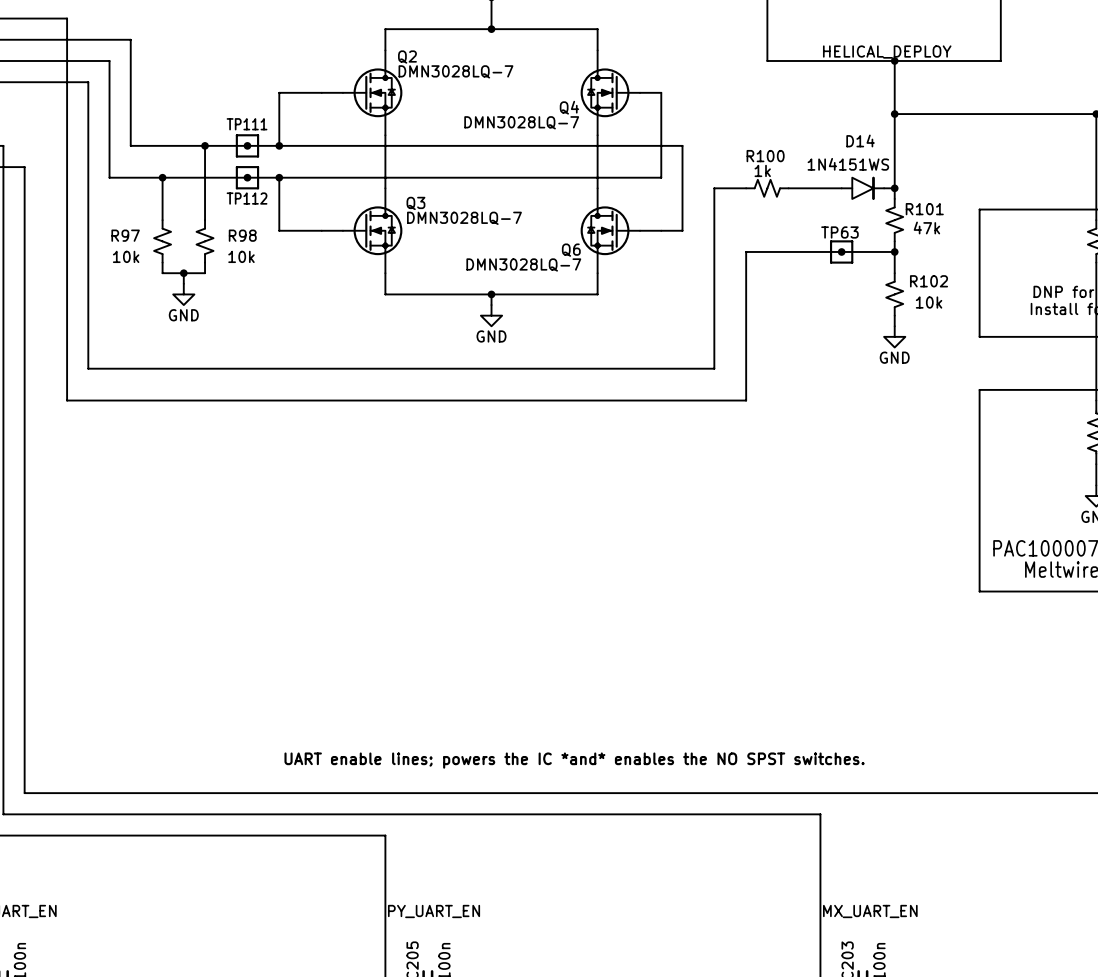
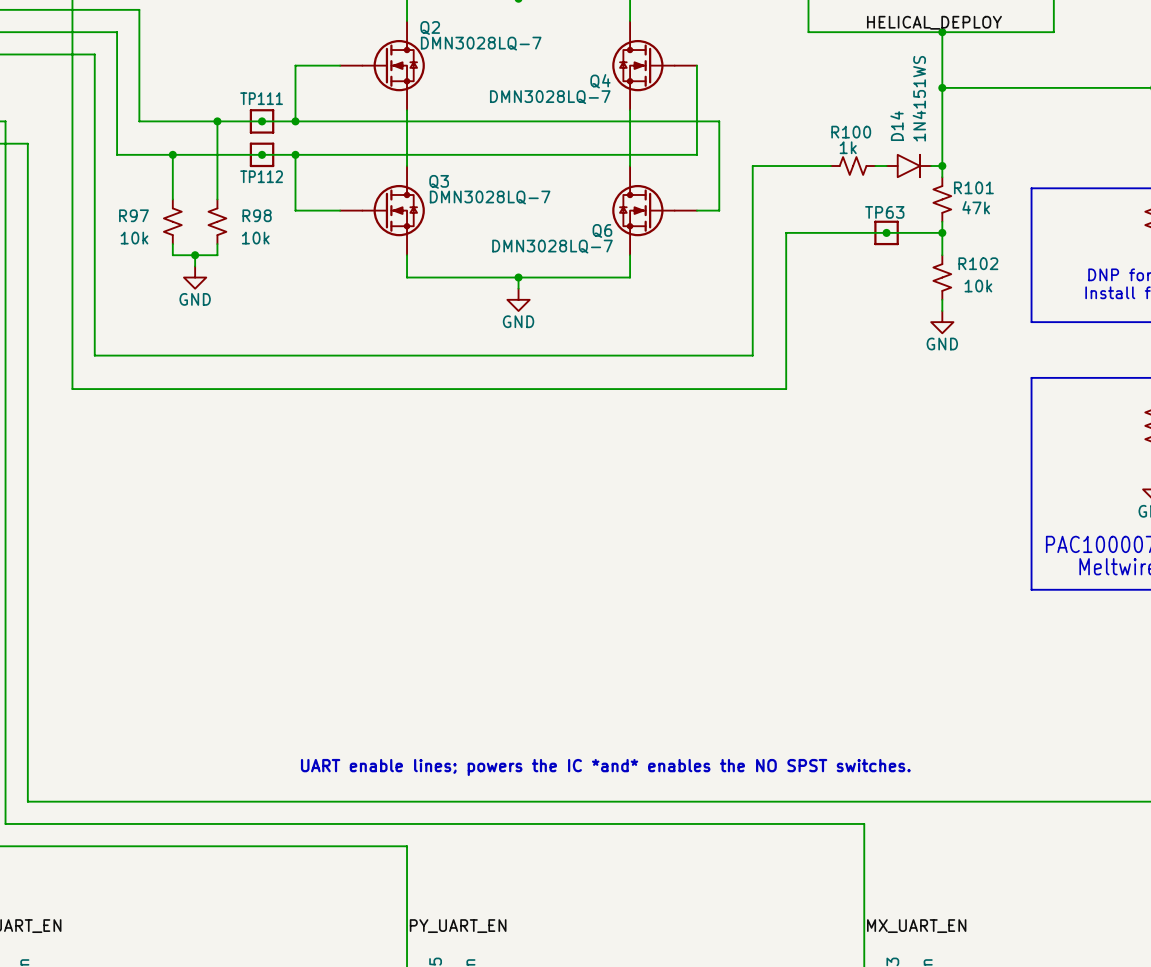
D14 name rotation: 0° (860, 140) -> 90° counterclockwise (897, 126)
D14 value rotation: 0° (848, 164) -> 90° counterclockwise (919, 98)
R100 position: (767, 188) -> (853, 166)

